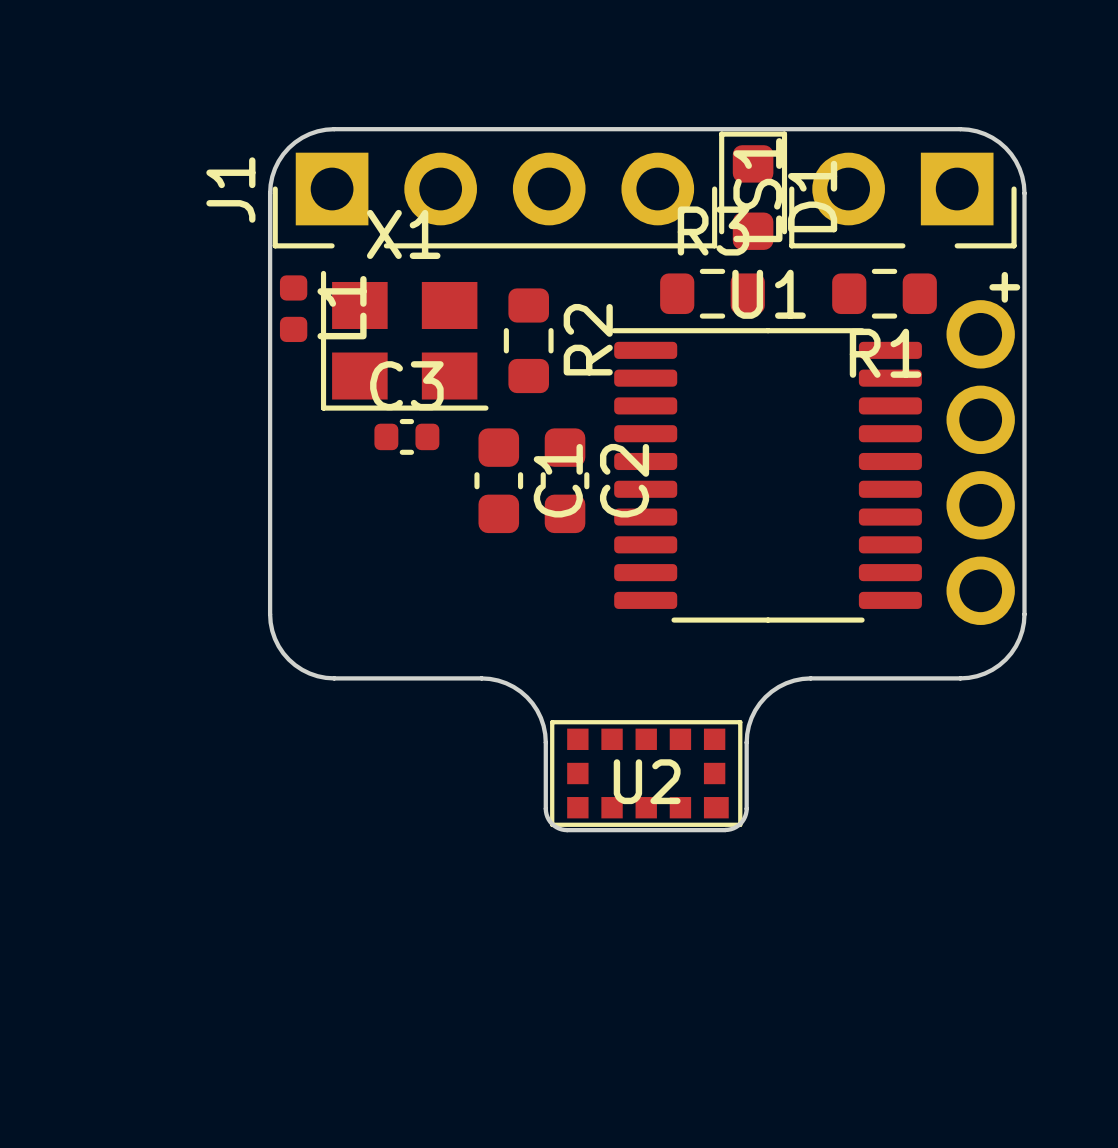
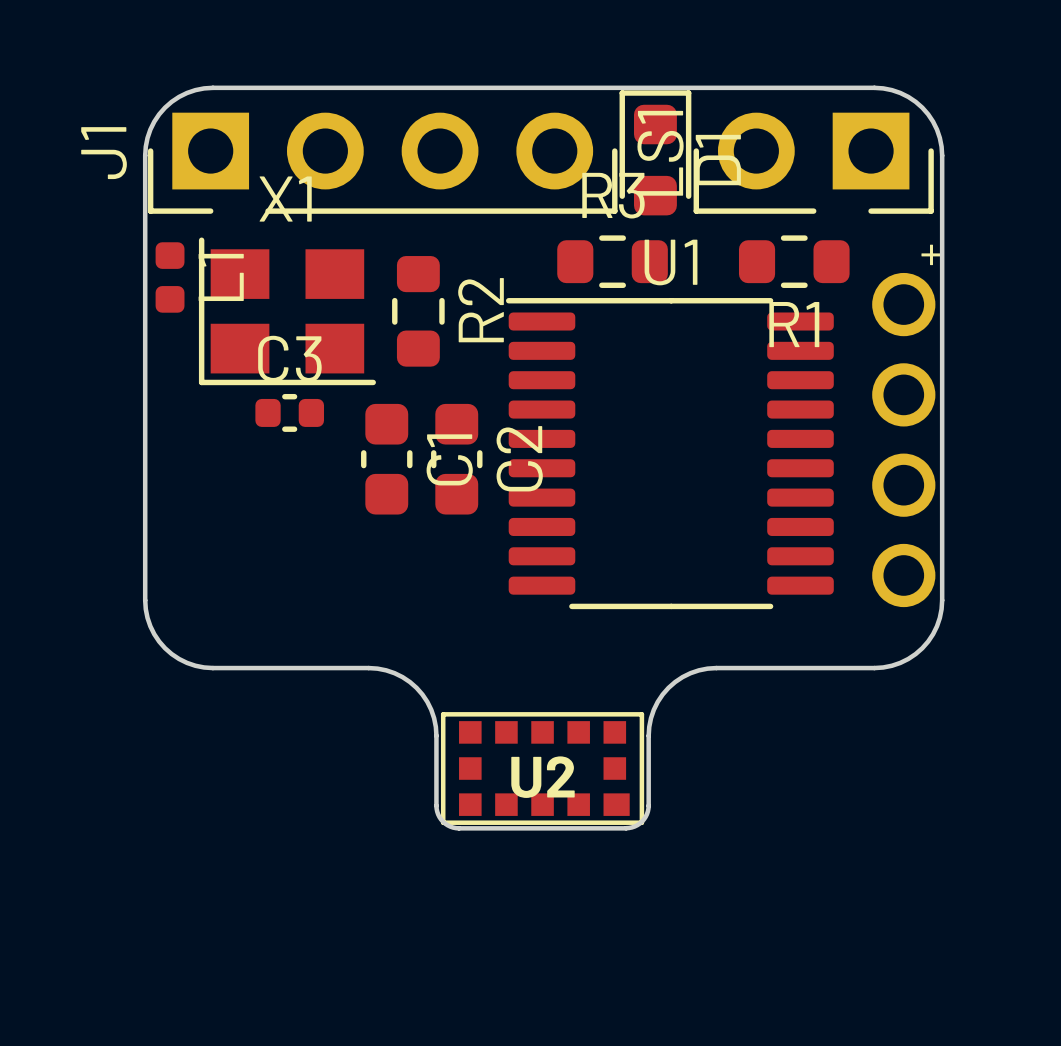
part footprint: [946, 300, 1015, 625] -> [872, 272, 936, 608]

